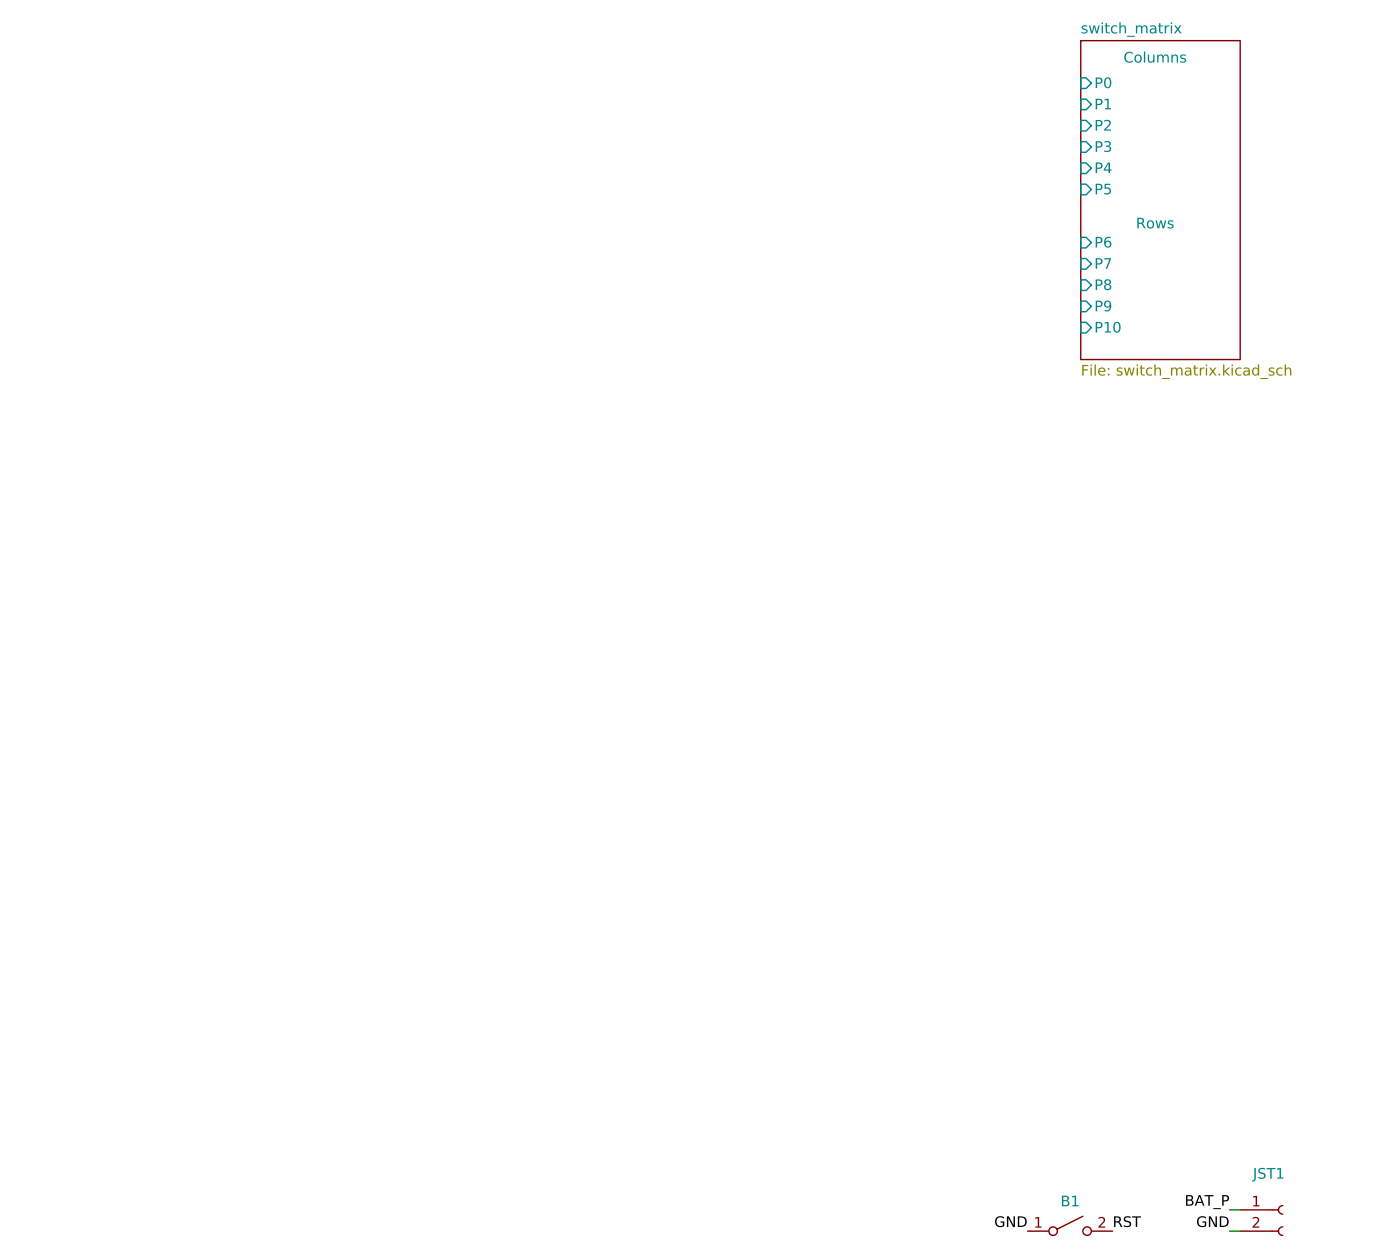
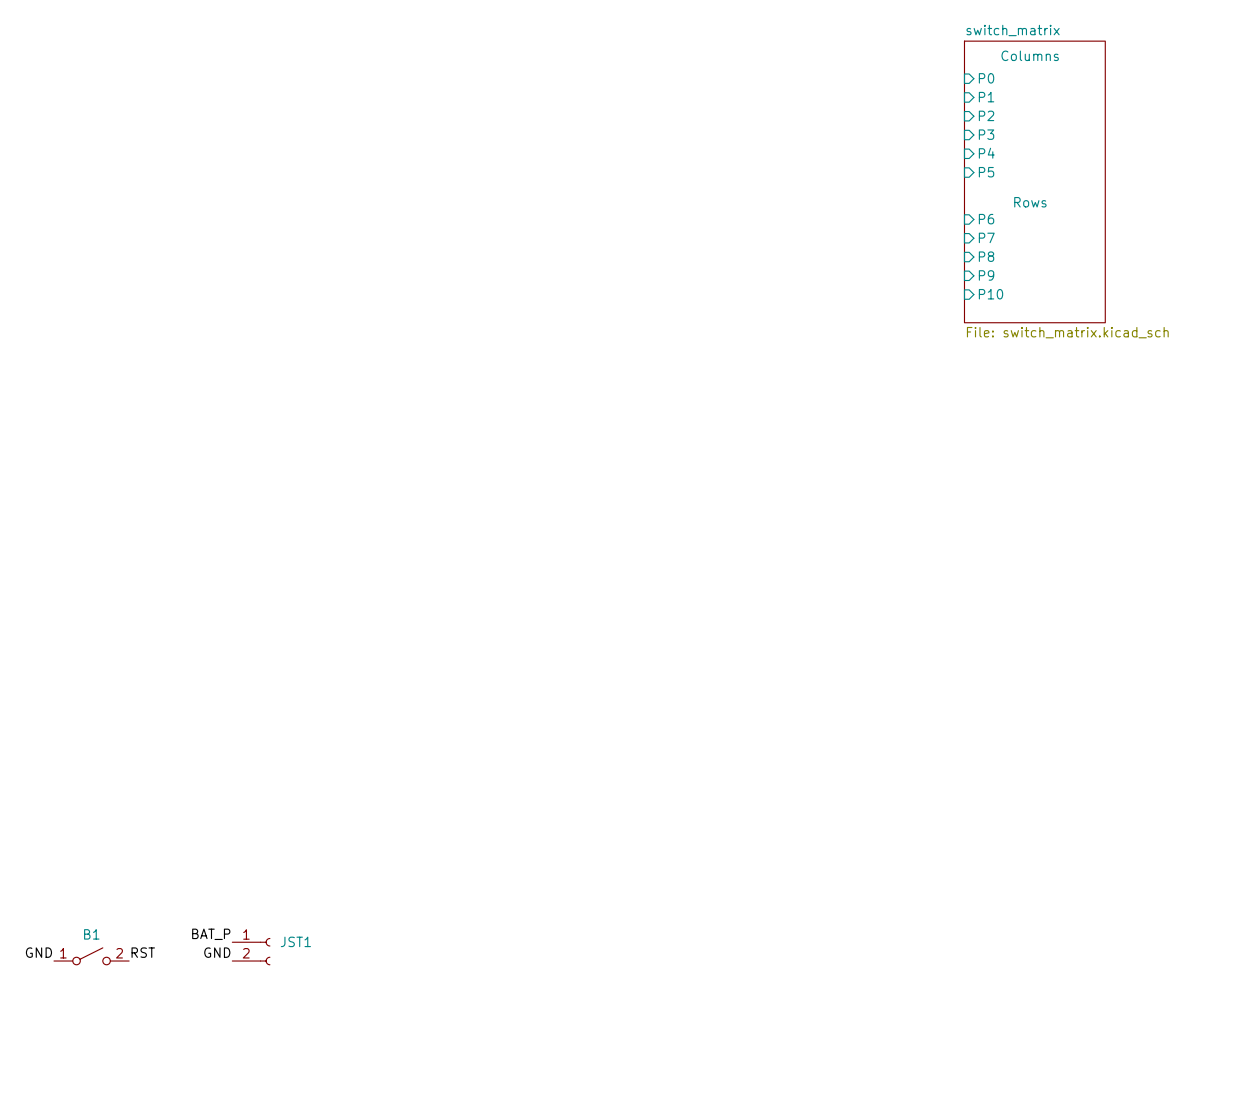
label: none -> BAT_P (211, 934)
label: none -> GND (38, 952)
label: none -> RST (143, 952)
label: none -> GND (217, 952)
JST1 name position: JST1 (1267, 1174) -> JST1 (295, 941)
label: BAT_P (1207, 1202) -> none
wire: (1229, 1209) (1240, 1209) -> none
JST1 position: (1261, 1220) -> (251, 951)
label: GND (1010, 1221) -> none
label: RST (1127, 1221) -> none
label: GND (1212, 1221) -> none
B1 position: (1070, 1225) -> (91, 956)
wire: (1229, 1231) (1240, 1231) -> none

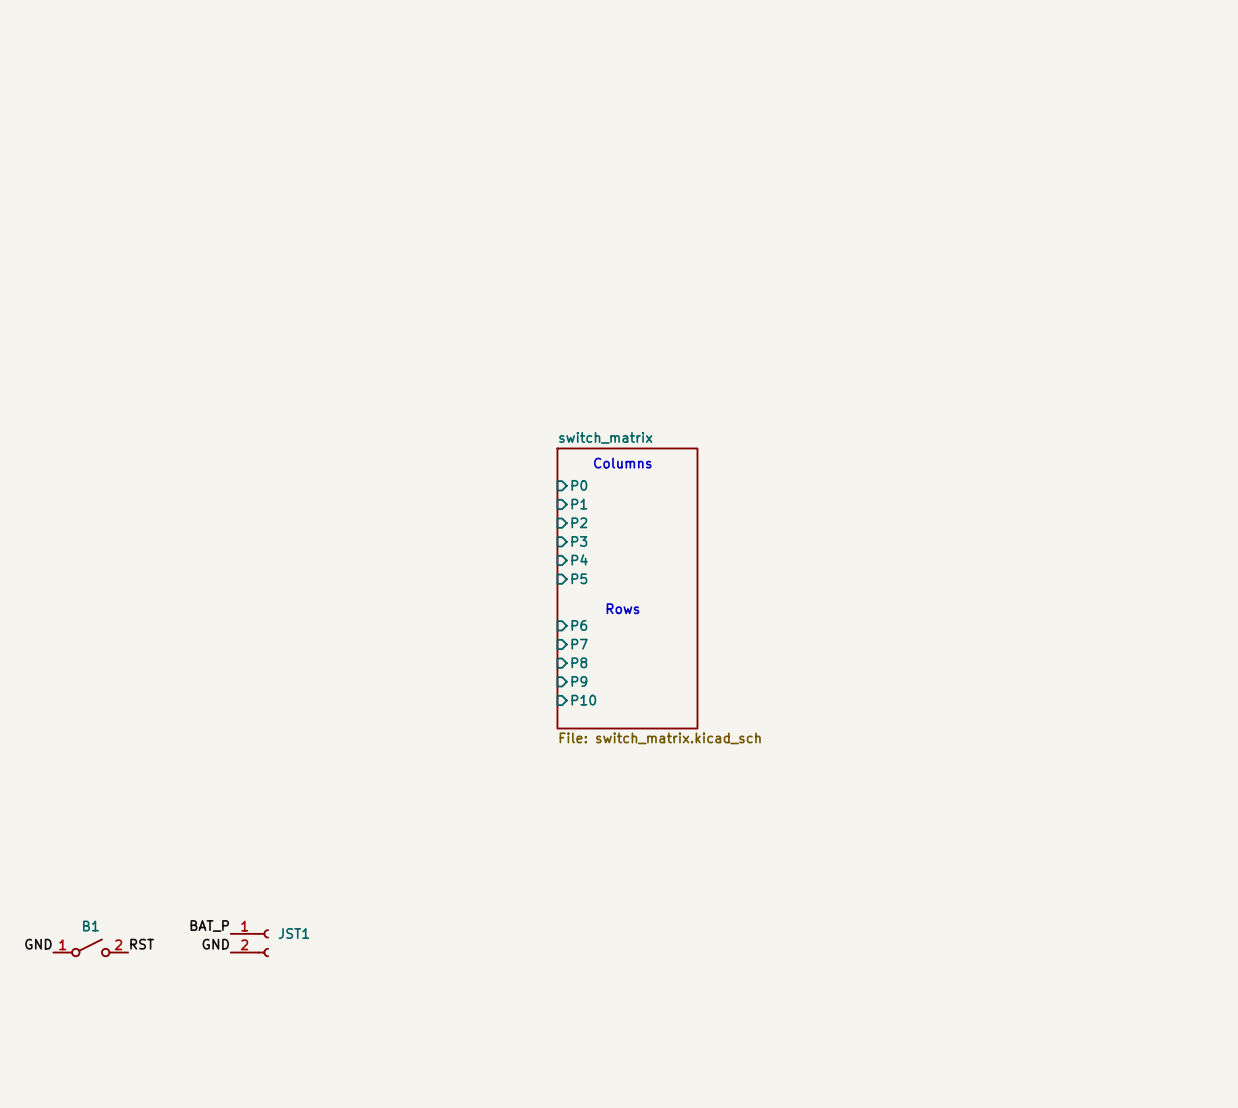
sheet pin: P0 (986, 78) -> none
sheet pin: P1 (986, 97) -> none
sheet pin: P2 (986, 115) -> none
sheet pin: P3 (986, 134) -> none
sheet pin: P4 (986, 153) -> none
sheet pin: P5 (986, 172) -> none
sheet switch_matrix: File: switch_matrix.kicad_sch (1034, 181) -> none
sheet pin: P6 (986, 219) -> none
sheet pin: P7 (986, 237) -> none
sheet pin: P8 (986, 256) -> none
sheet pin: P9 (986, 275) -> none
sheet pin: P10 (991, 294) -> none
text: none -> Columns (622, 463)
sheet pin: none -> P0 (579, 485)
sheet pin: none -> P1 (579, 504)
sheet pin: none -> P2 (579, 522)
sheet pin: none -> P3 (579, 541)
sheet pin: none -> P4 (579, 559)
sheet pin: none -> P5 (579, 578)
sheet switch_matrix: none -> File: switch_matrix.kicad_sch (627, 588)
text: none -> Rows (623, 608)
sheet pin: none -> P6 (579, 625)
sheet pin: none -> P7 (579, 644)
sheet pin: none -> P8 (579, 662)
sheet pin: none -> P9 (579, 681)
sheet pin: none -> P10 (583, 700)

